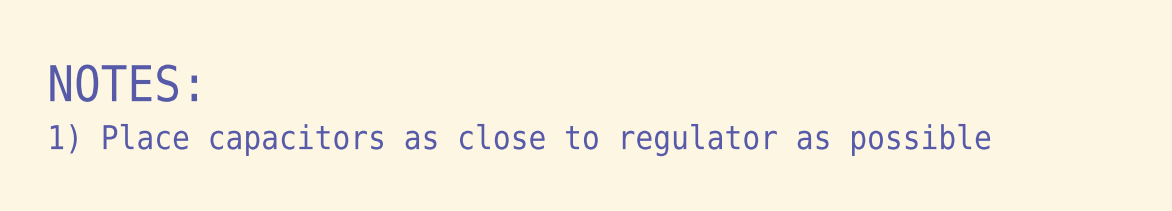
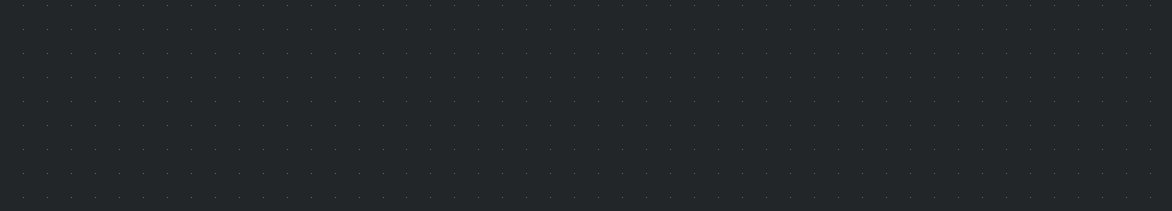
text: NOTES: (123, 83) -> none
text: 1) Place capacitors as close to regulator as possible (520, 140) -> none

